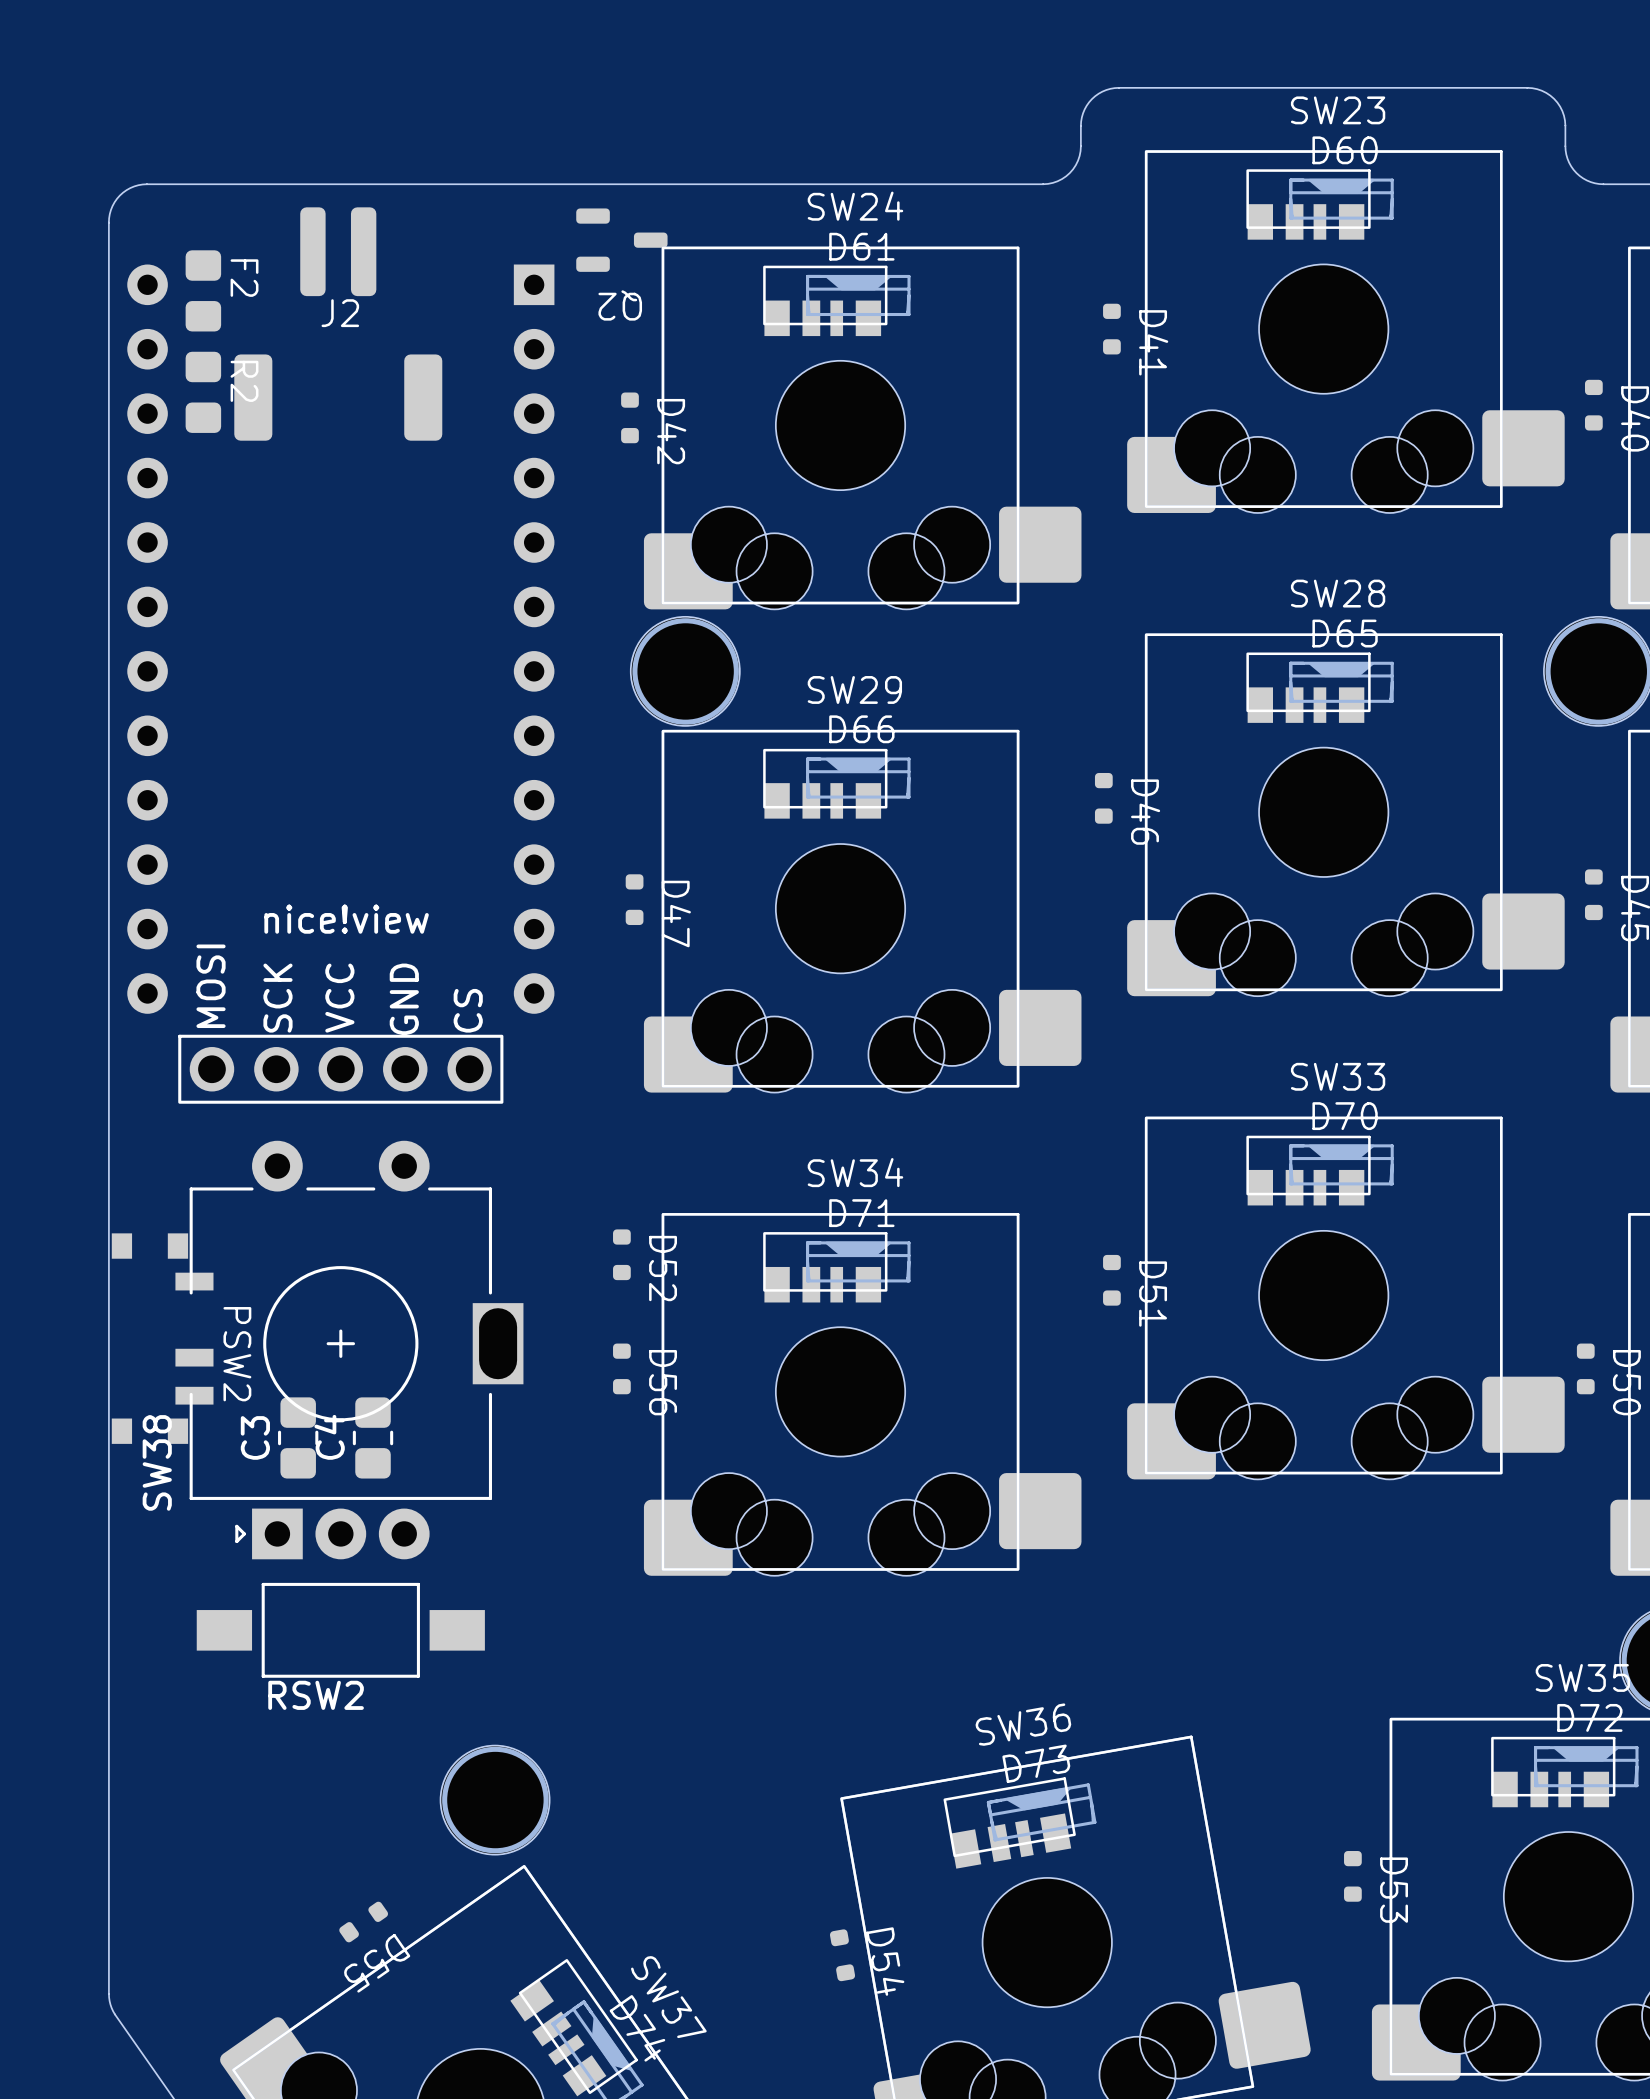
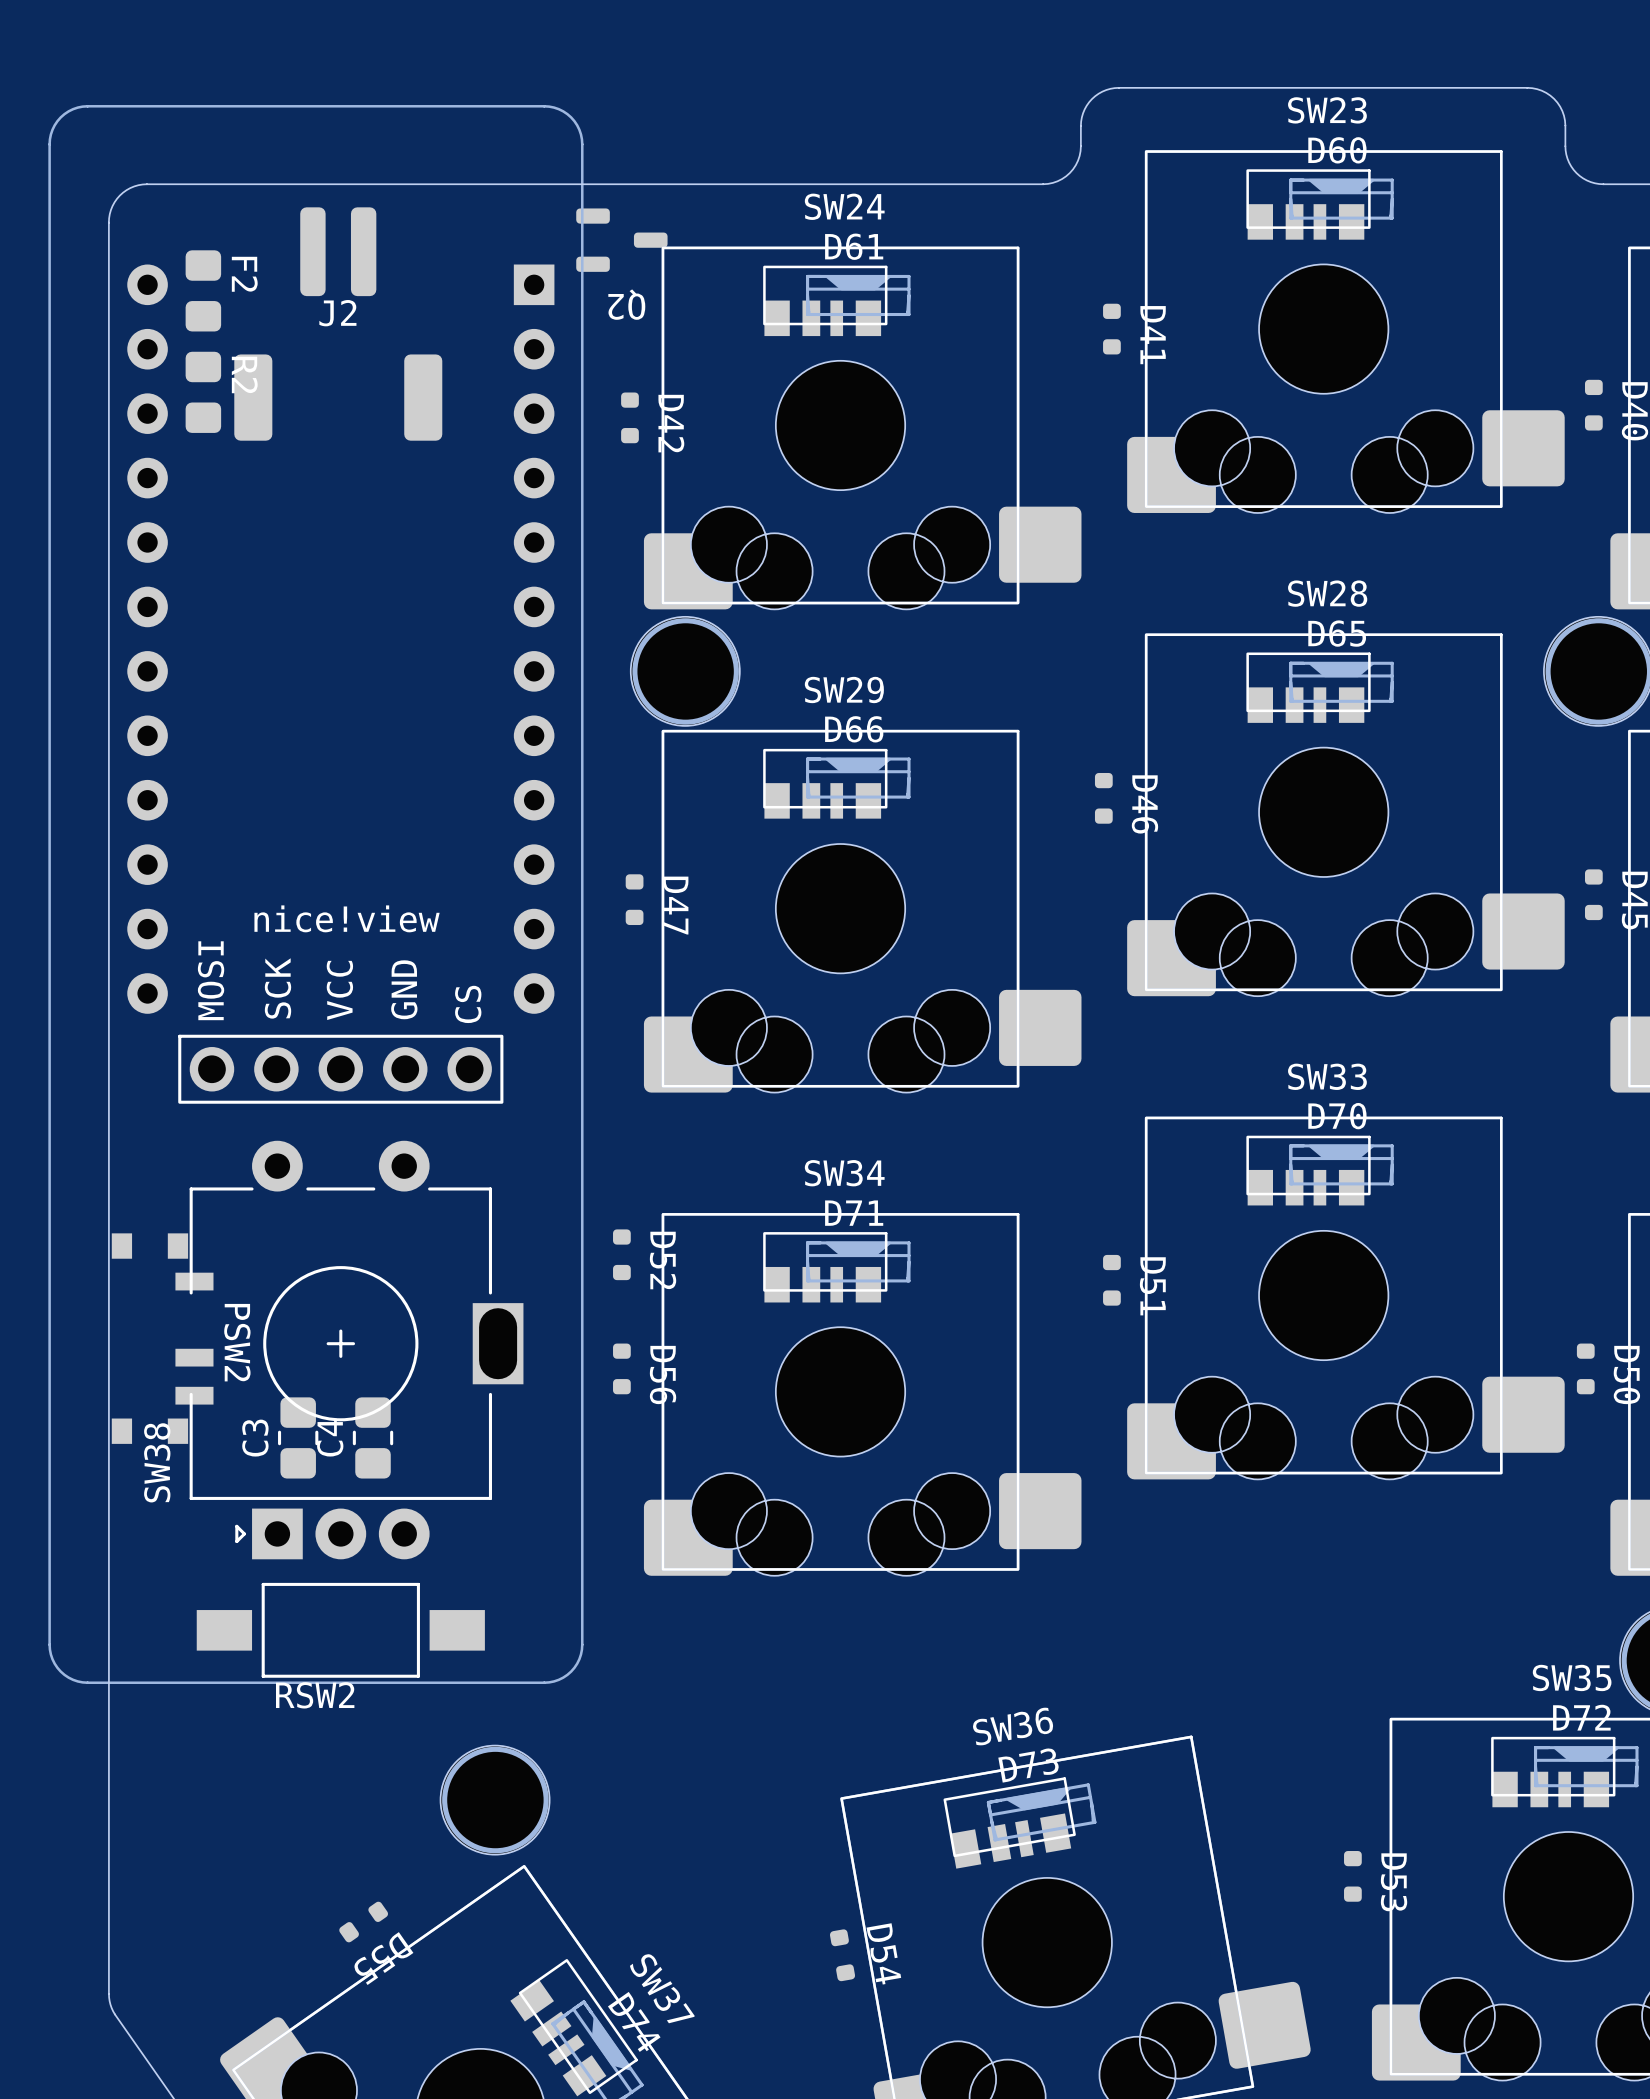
line: none -> (87, 106) (544, 106) (558, 109) (567, 114) (574, 121) (580, 134) (582, 1644) (579, 1659) (574, 1667) (563, 1677) (554, 1681) (87, 1682) (77, 1681) (64, 1674) (54, 1663) (50, 1654) (49, 144) (52, 129) (60, 117) (73, 109) (87, 106)

